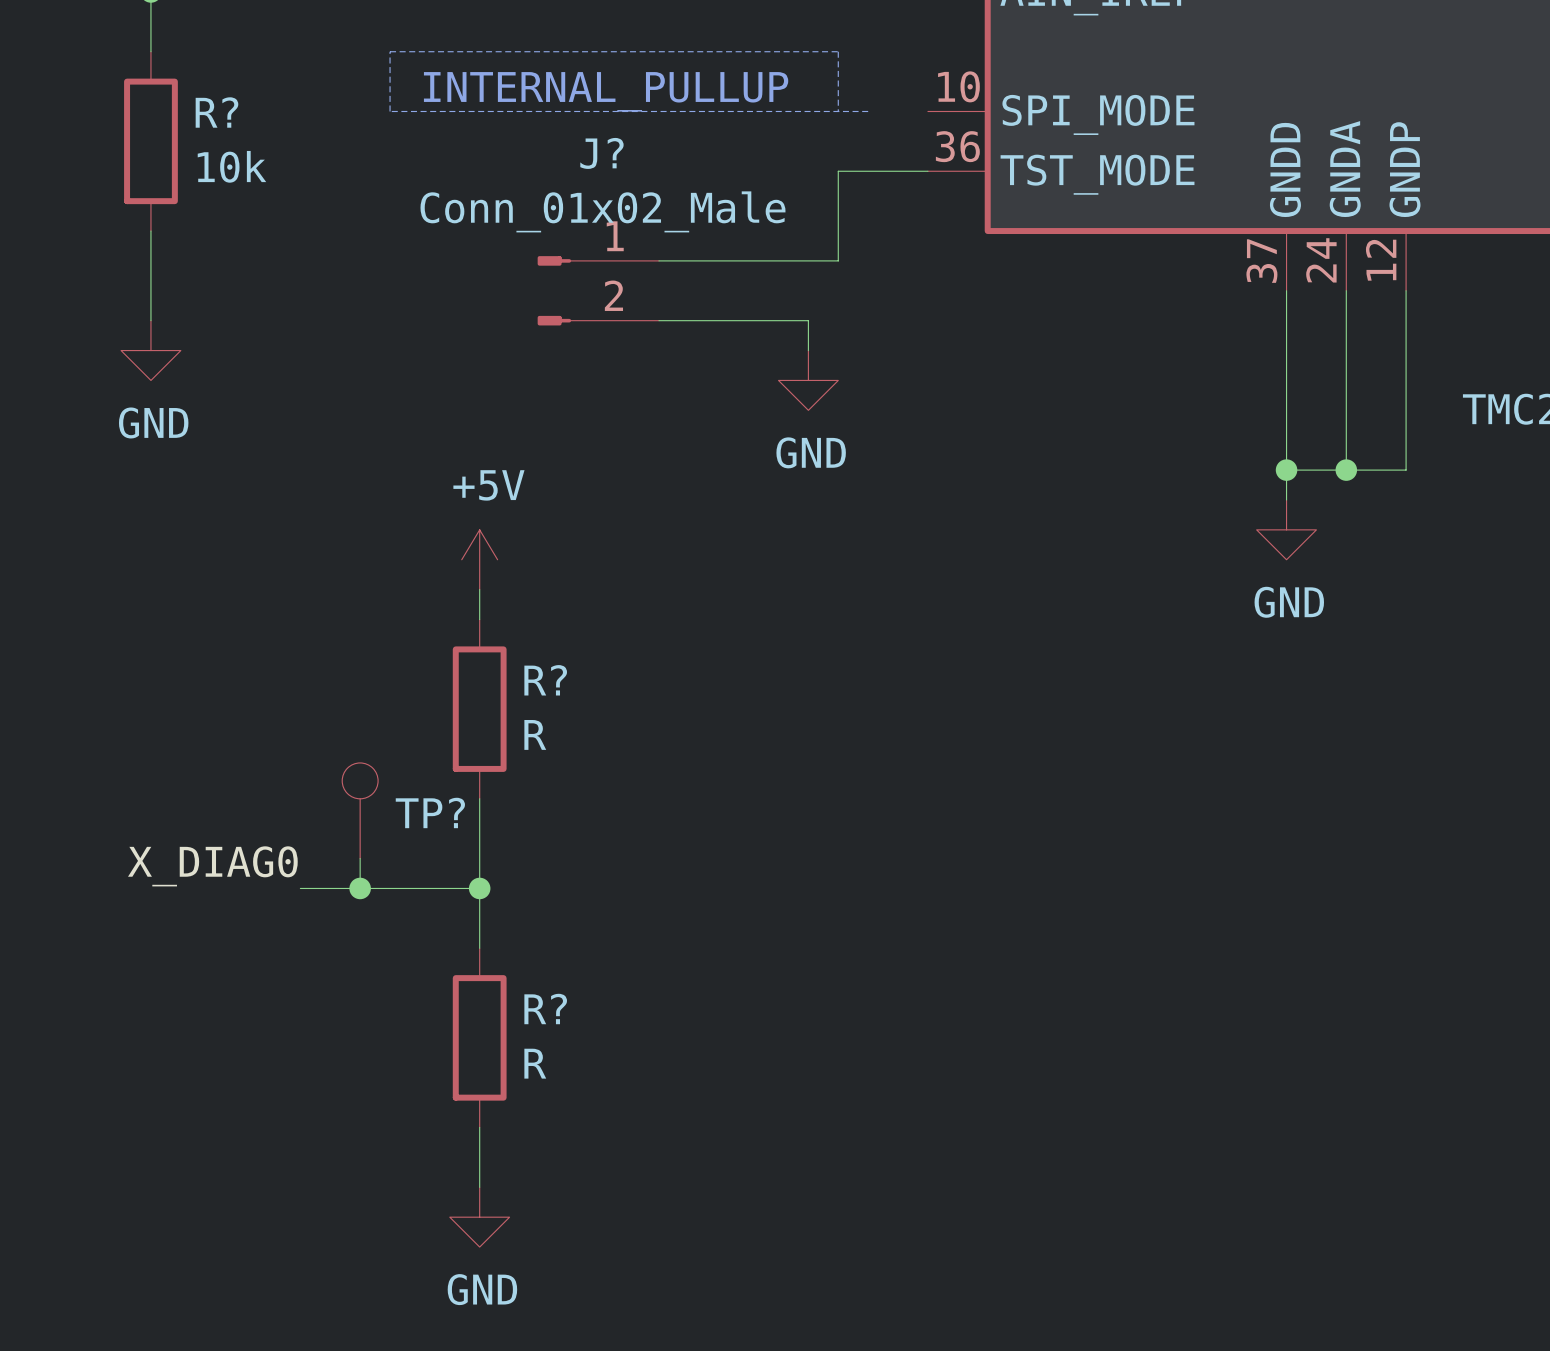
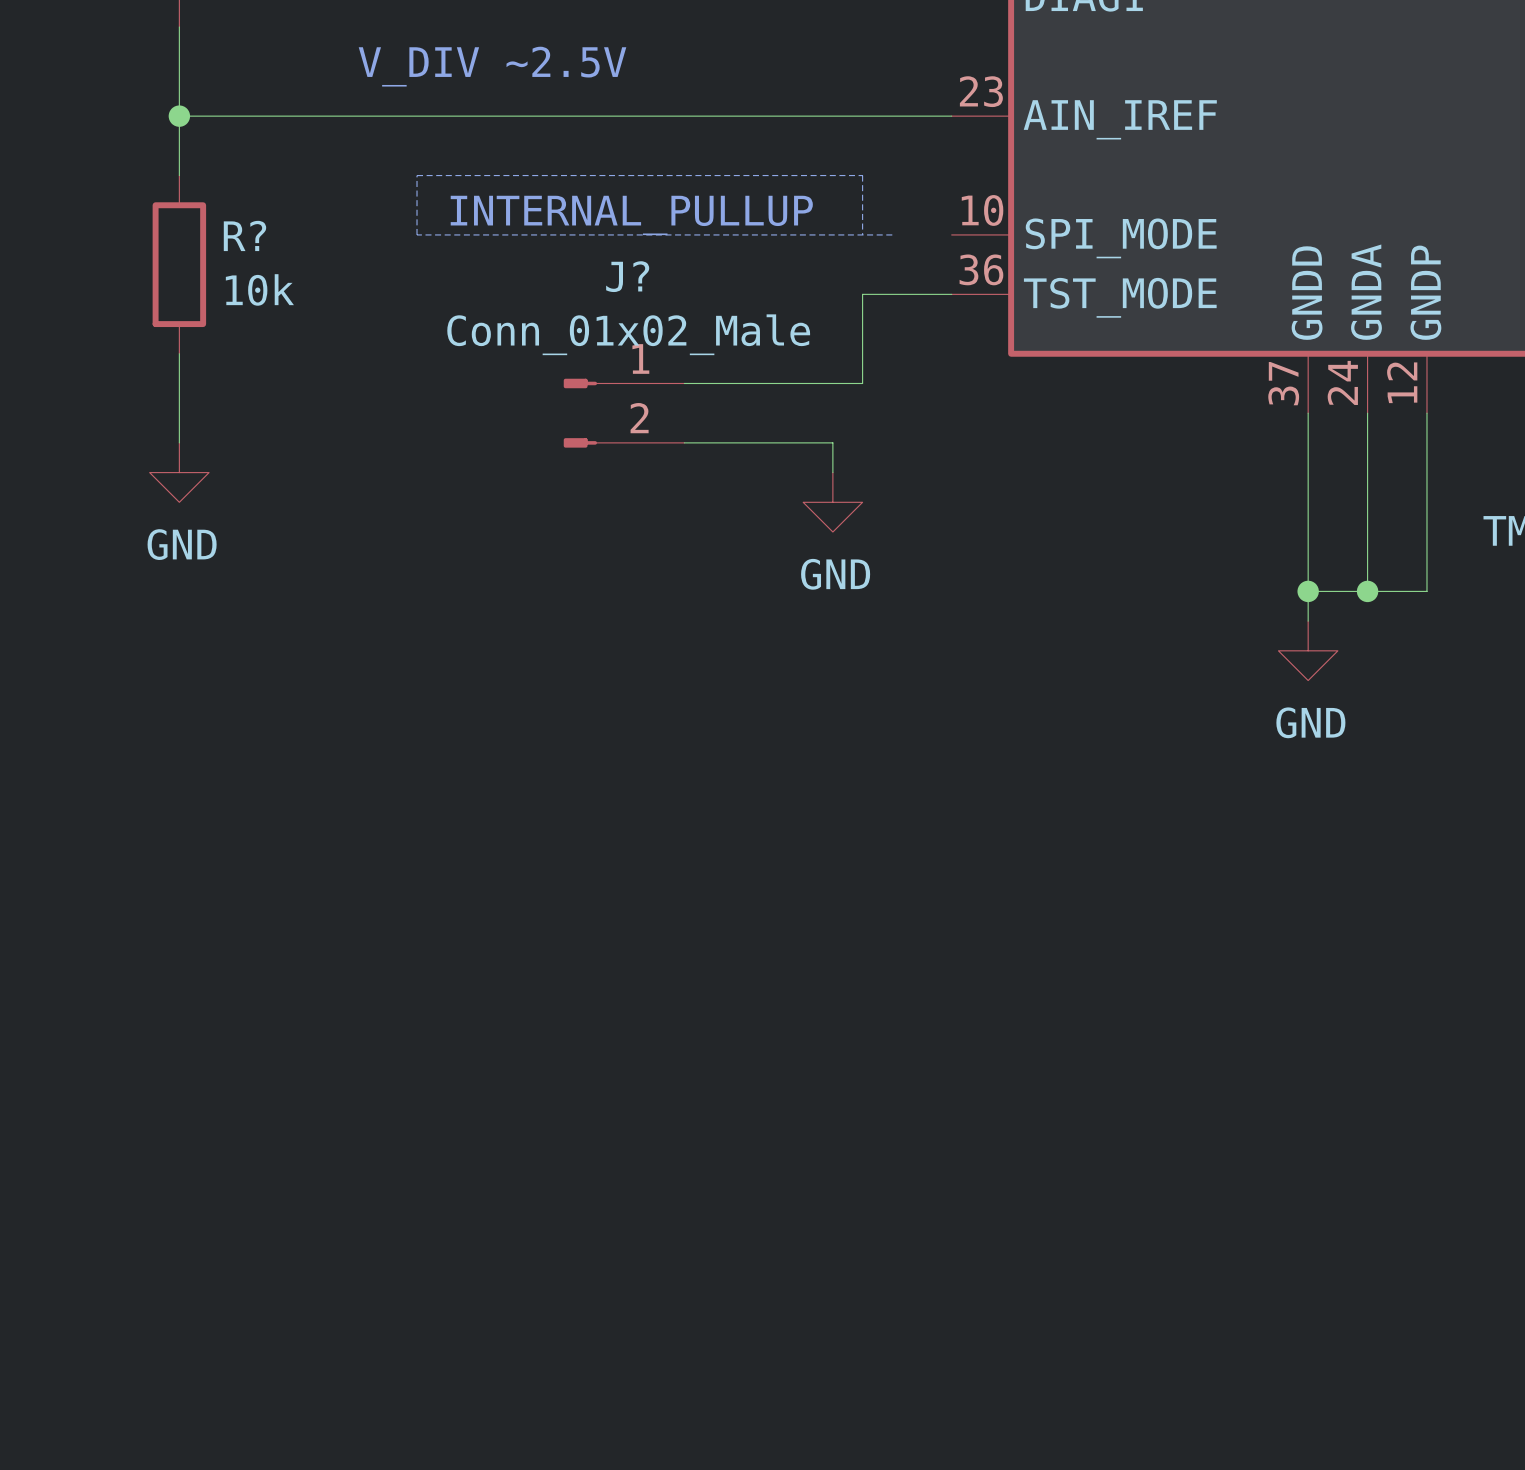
power symbol: +5V (479, 559) -> none
wire: (479, 589) (479, 619) -> none
R?: R (479, 709) -> none
wire: (479, 798) (479, 948) -> none
TP?: (360, 810) -> none
wire: (360, 858) (360, 888) -> none
label: X_DIAG0 (212, 866) -> none
wire: (300, 888) (479, 888) -> none
junction: (360, 888) -> none
junction: (479, 888) -> none
R?: R (479, 1037) -> none
wire: (479, 1127) (479, 1187) -> none
power symbol: GND (479, 1217) -> none

